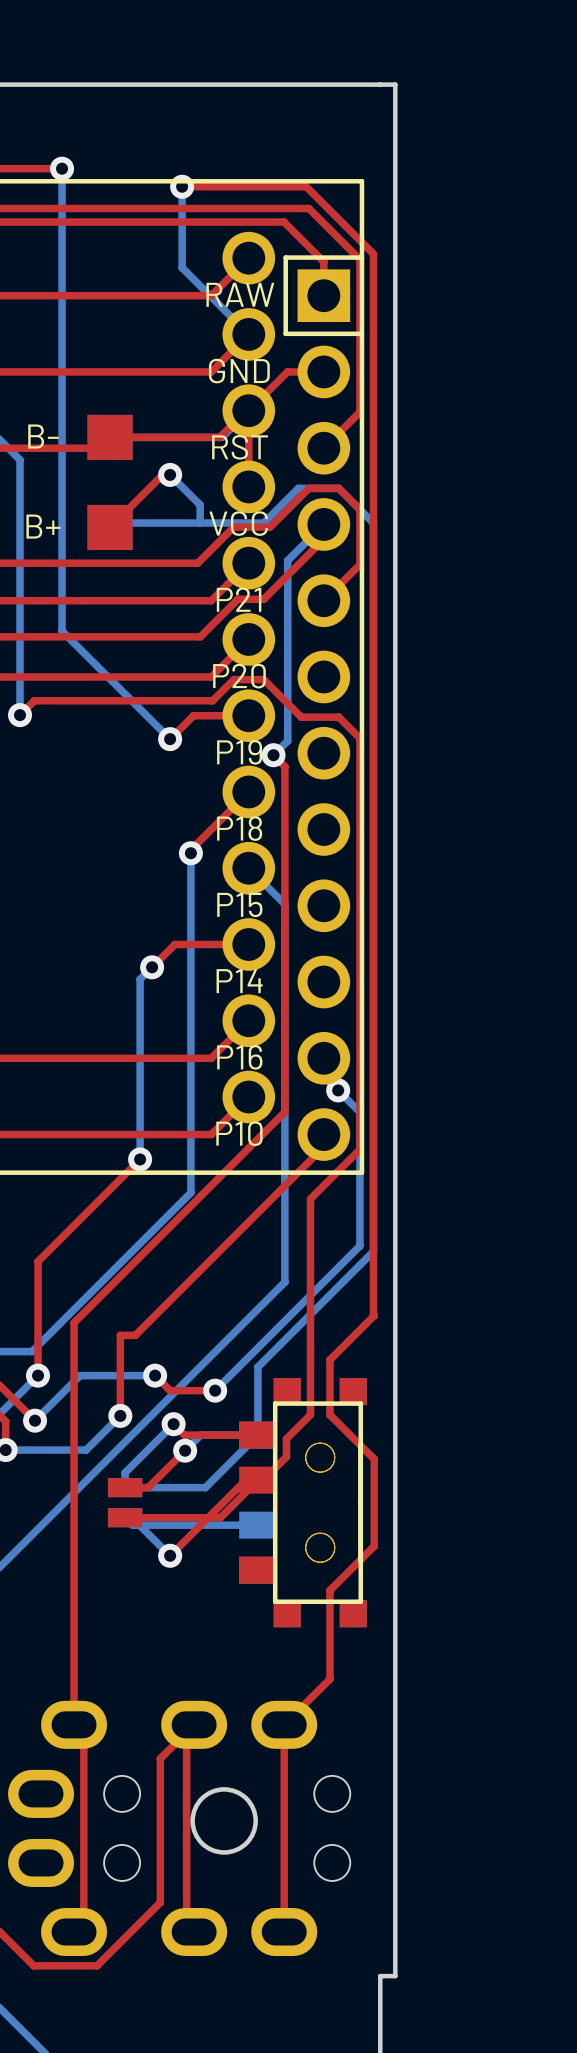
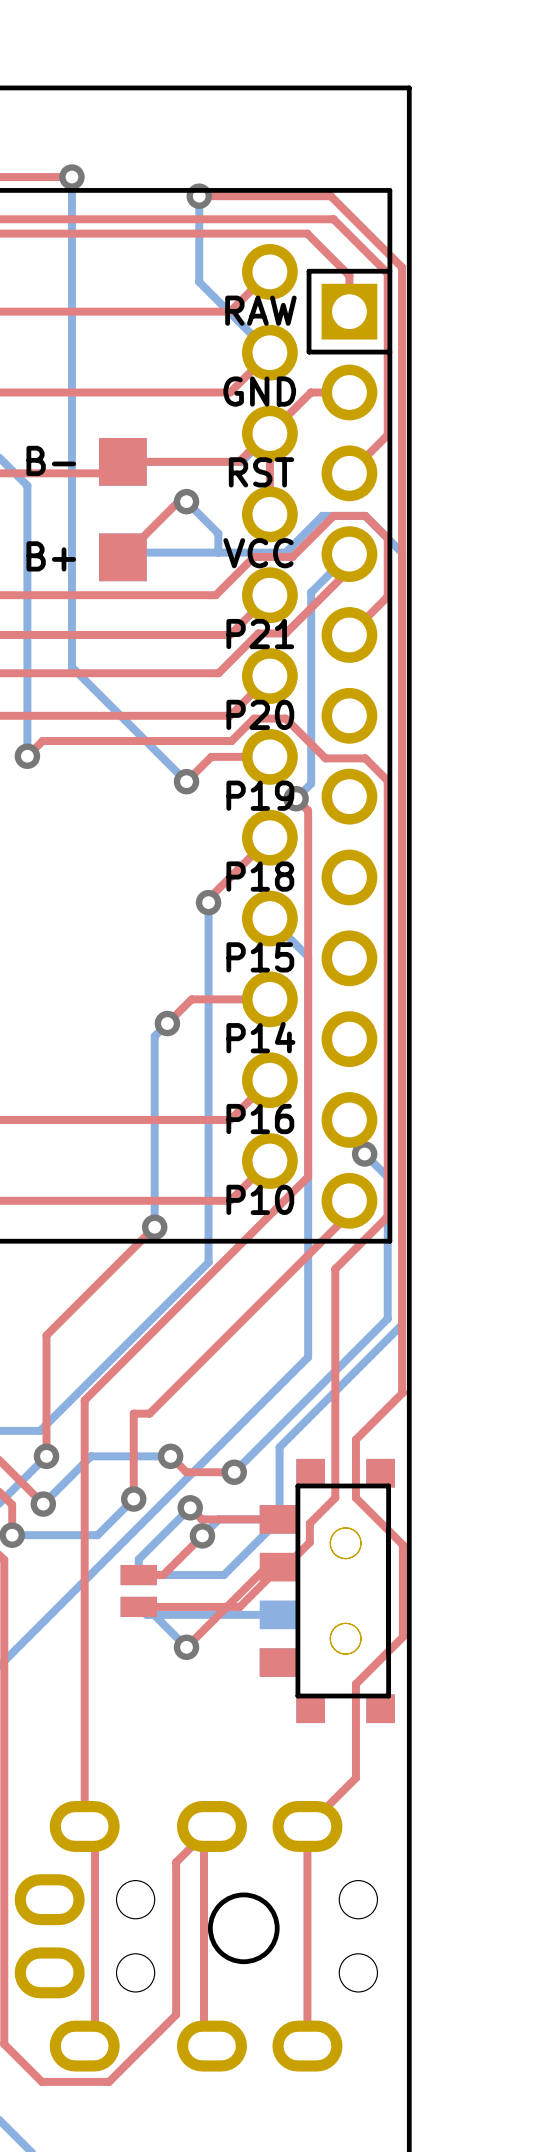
board edge: (380, 84) (395, 84) (395, 1976) (380, 1976) -> (409, 87) (409, 2092)

